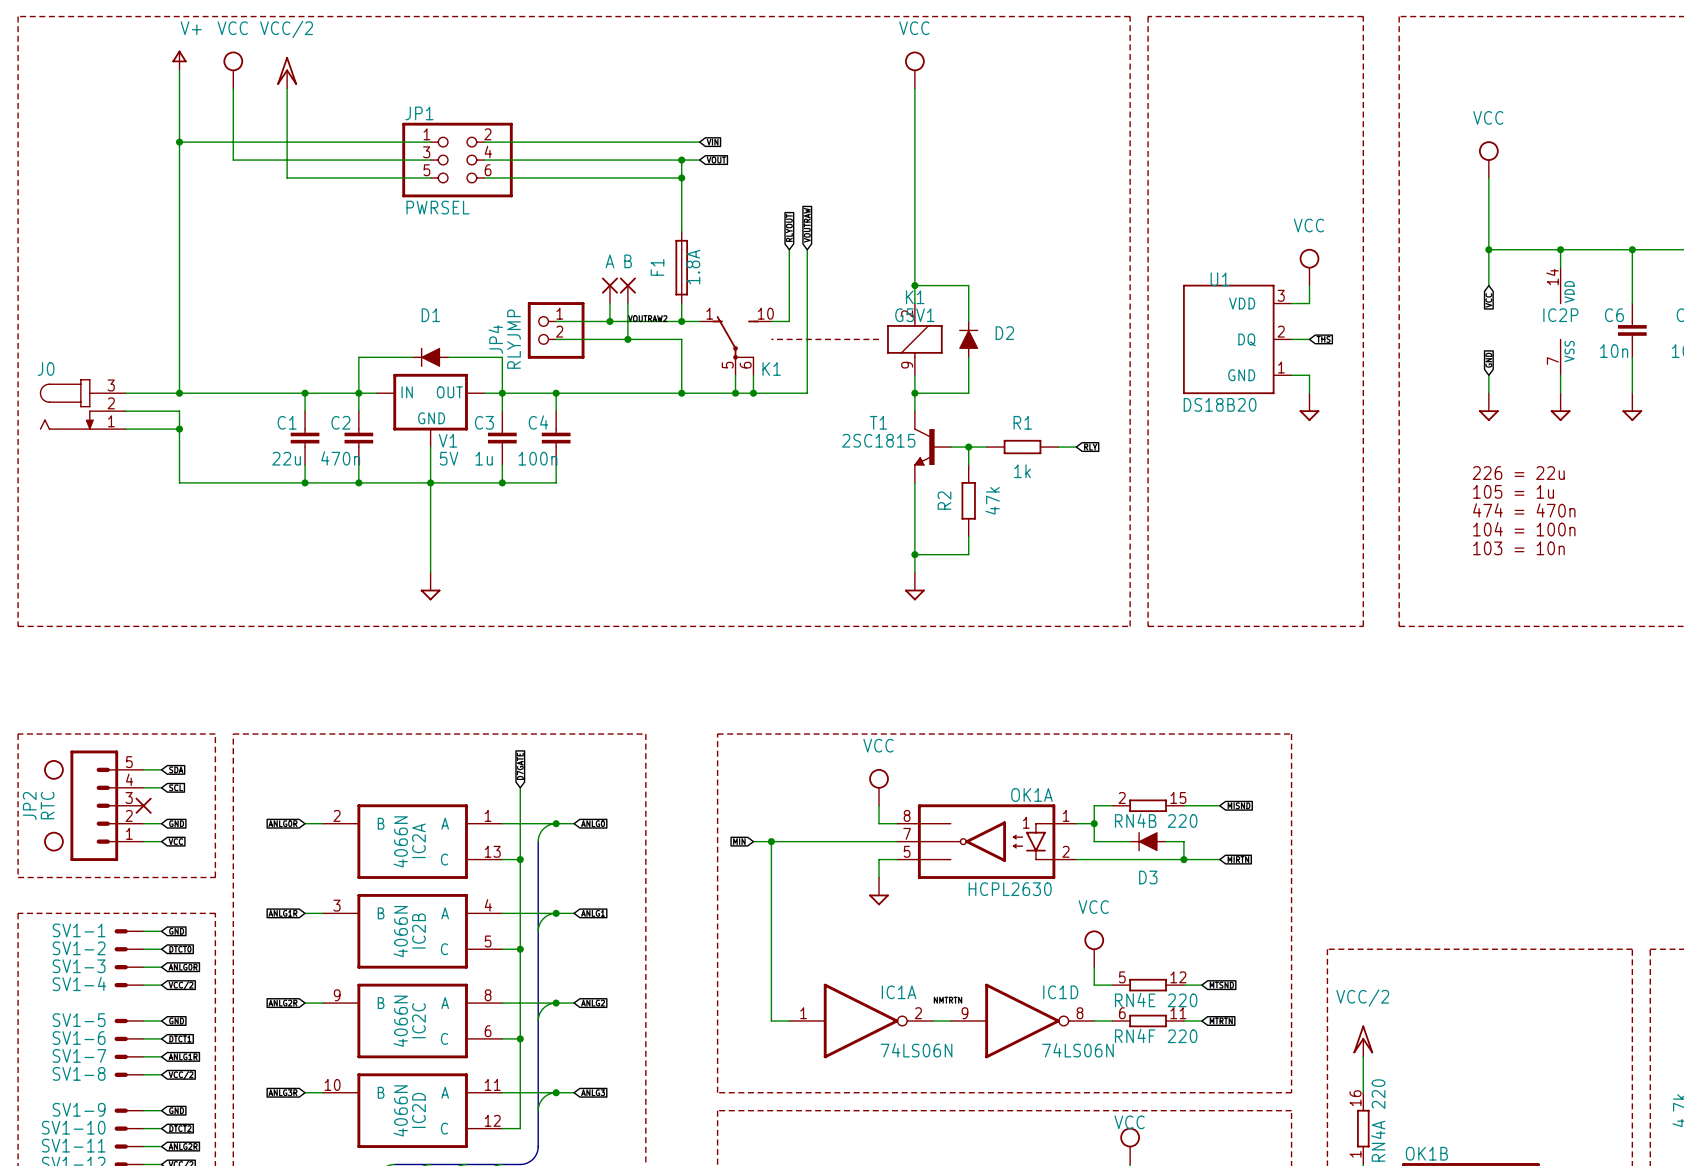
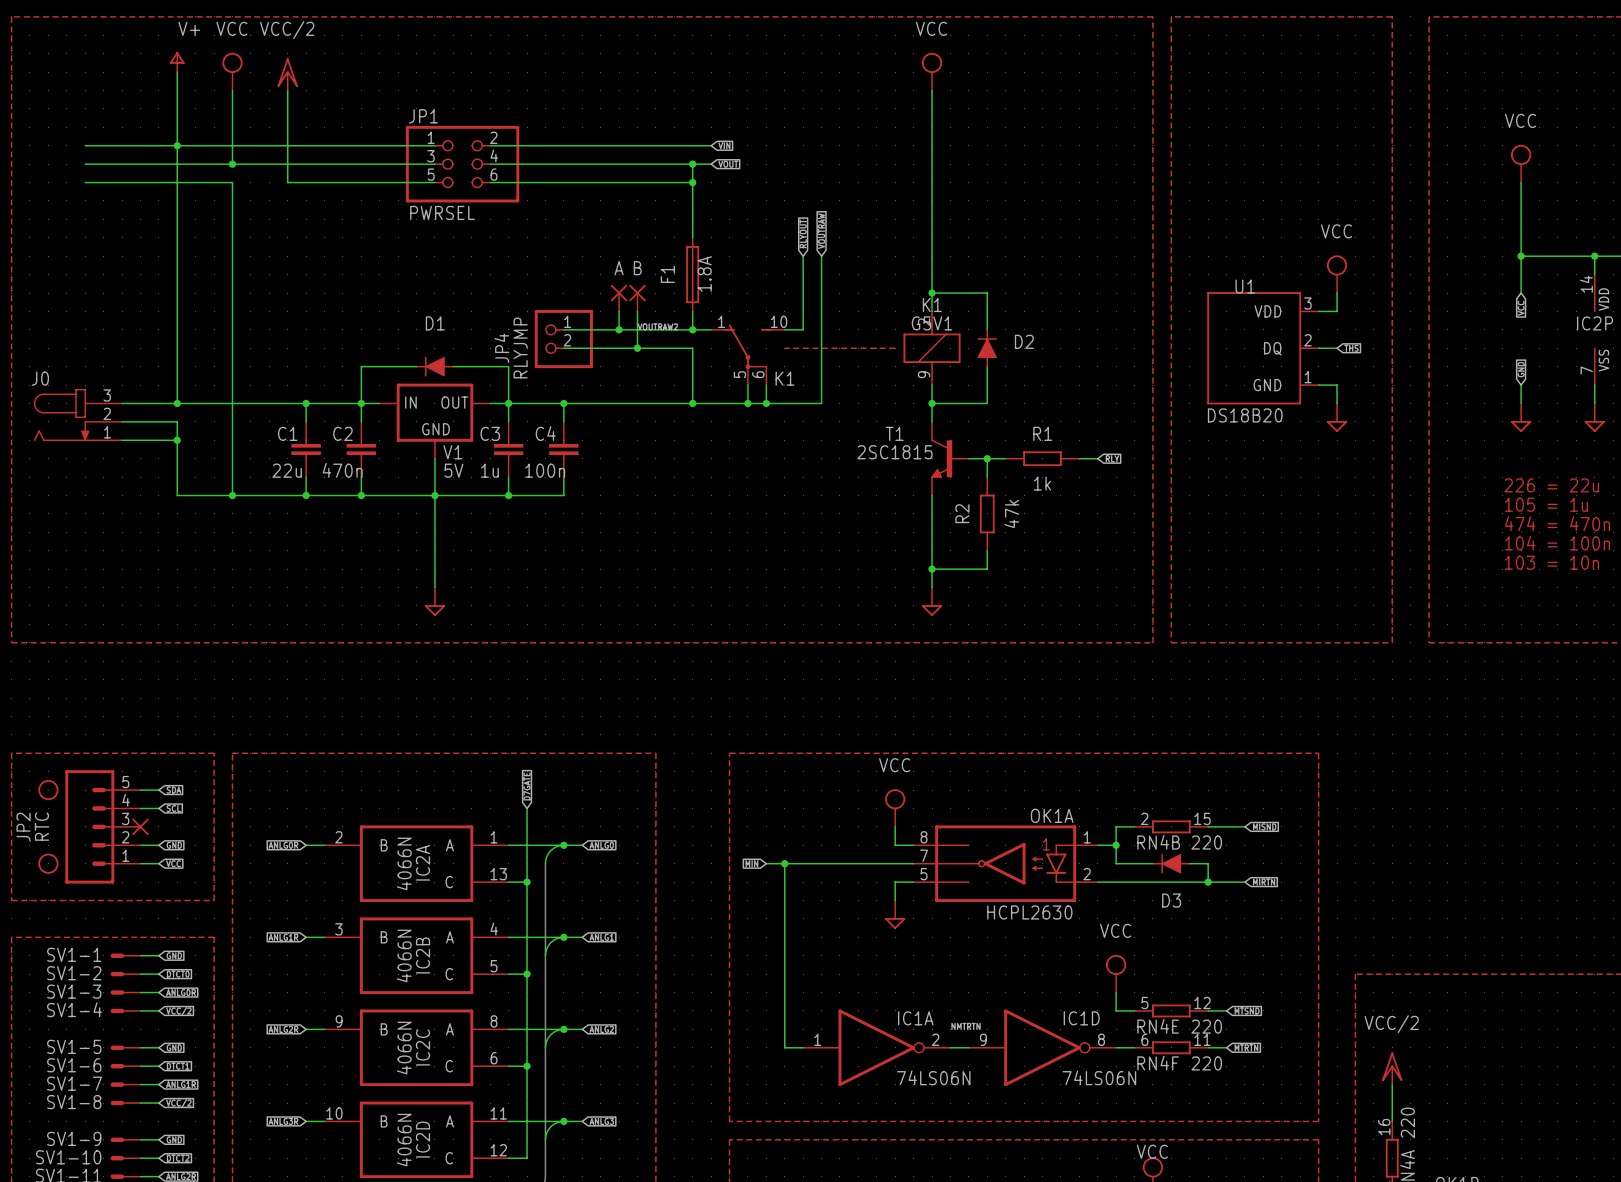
wire: none -> (85, 145) (177, 145)
wire: none -> (85, 164) (232, 164)
junction: none -> (232, 164)
wire: none -> (85, 182) (232, 182) (232, 495)
junction: none -> (232, 495)

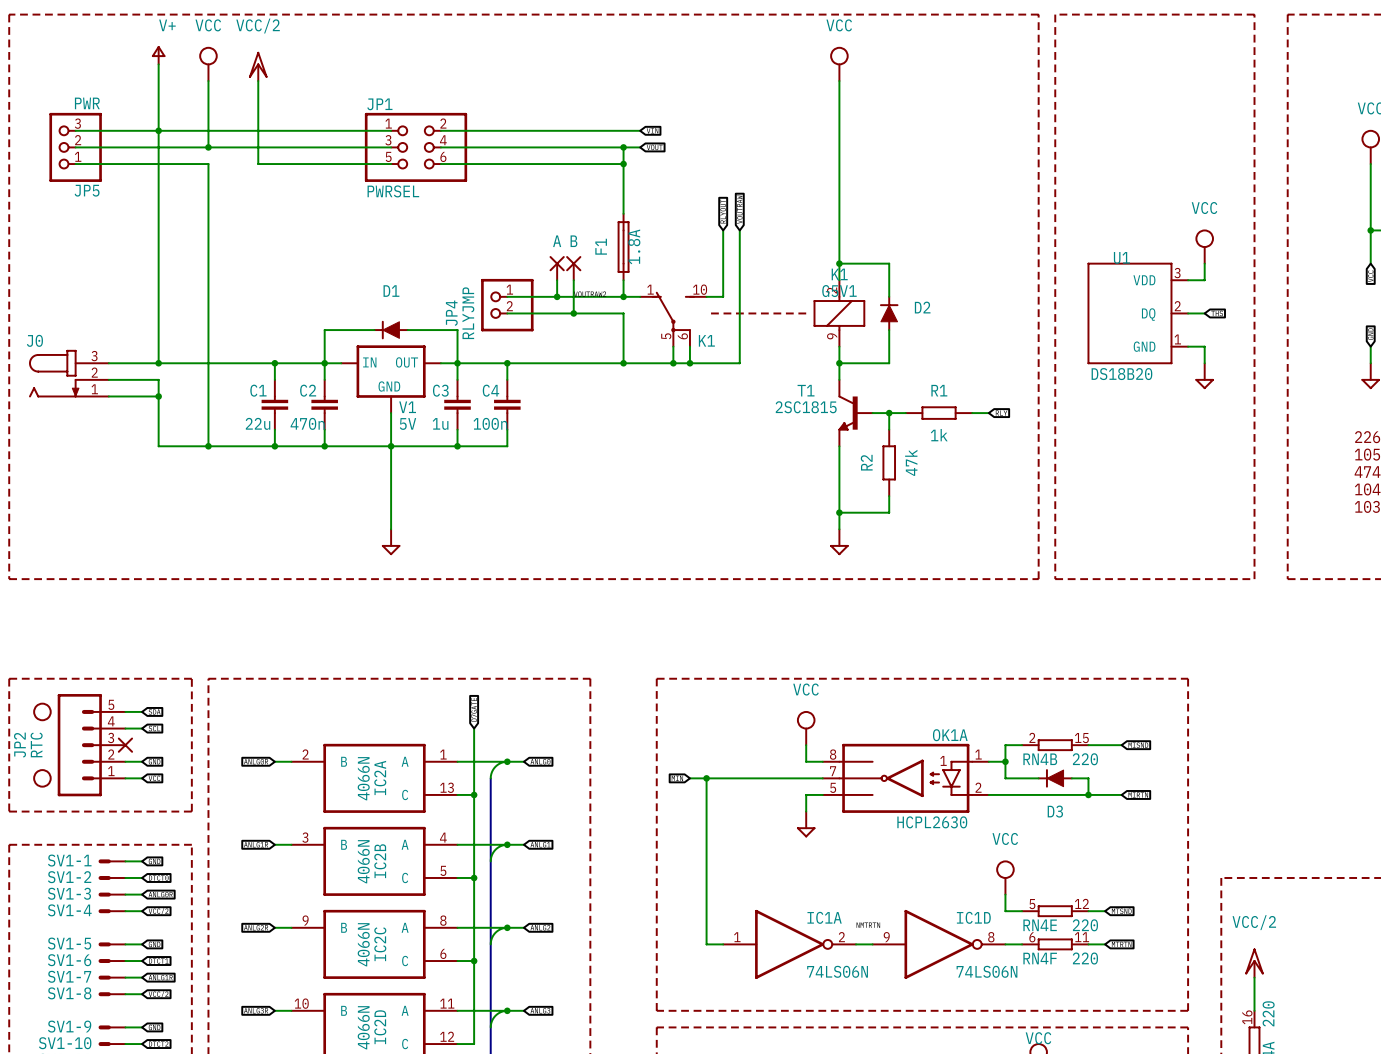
JP5: none -> PWR (75, 147)

